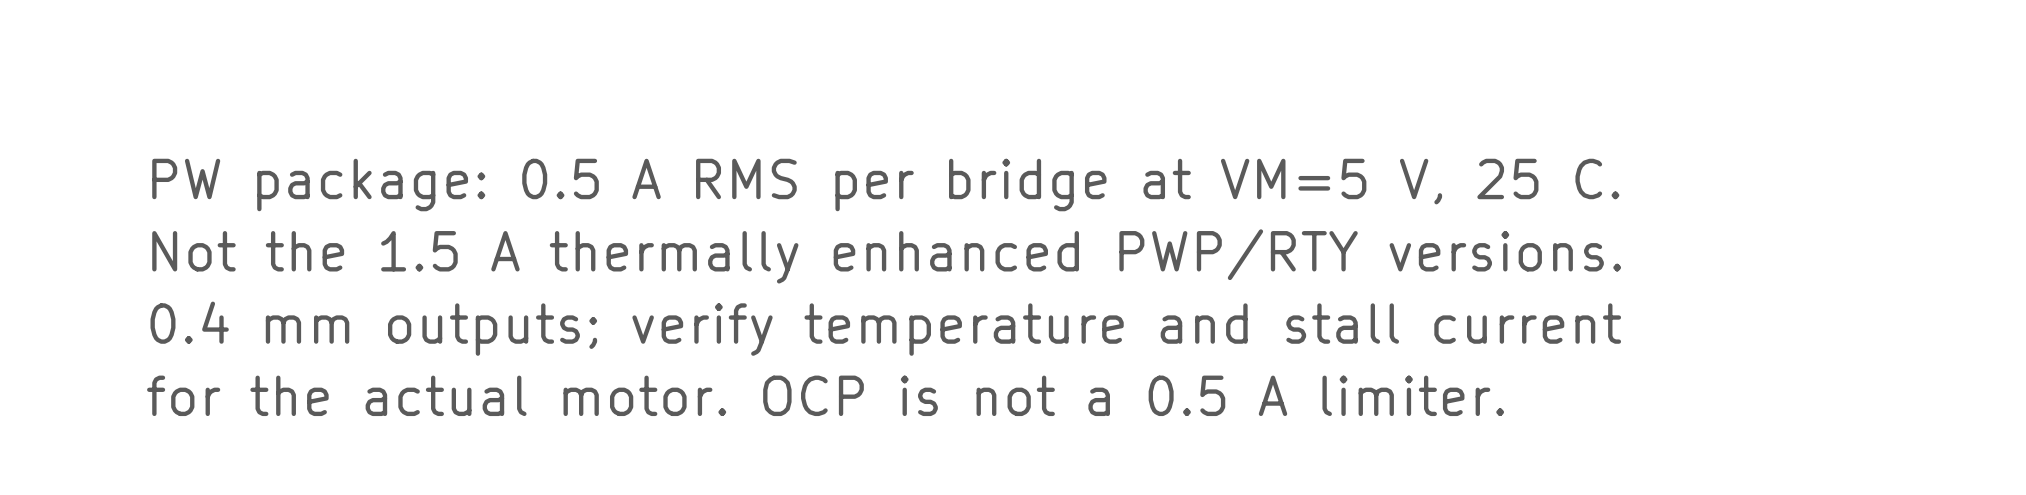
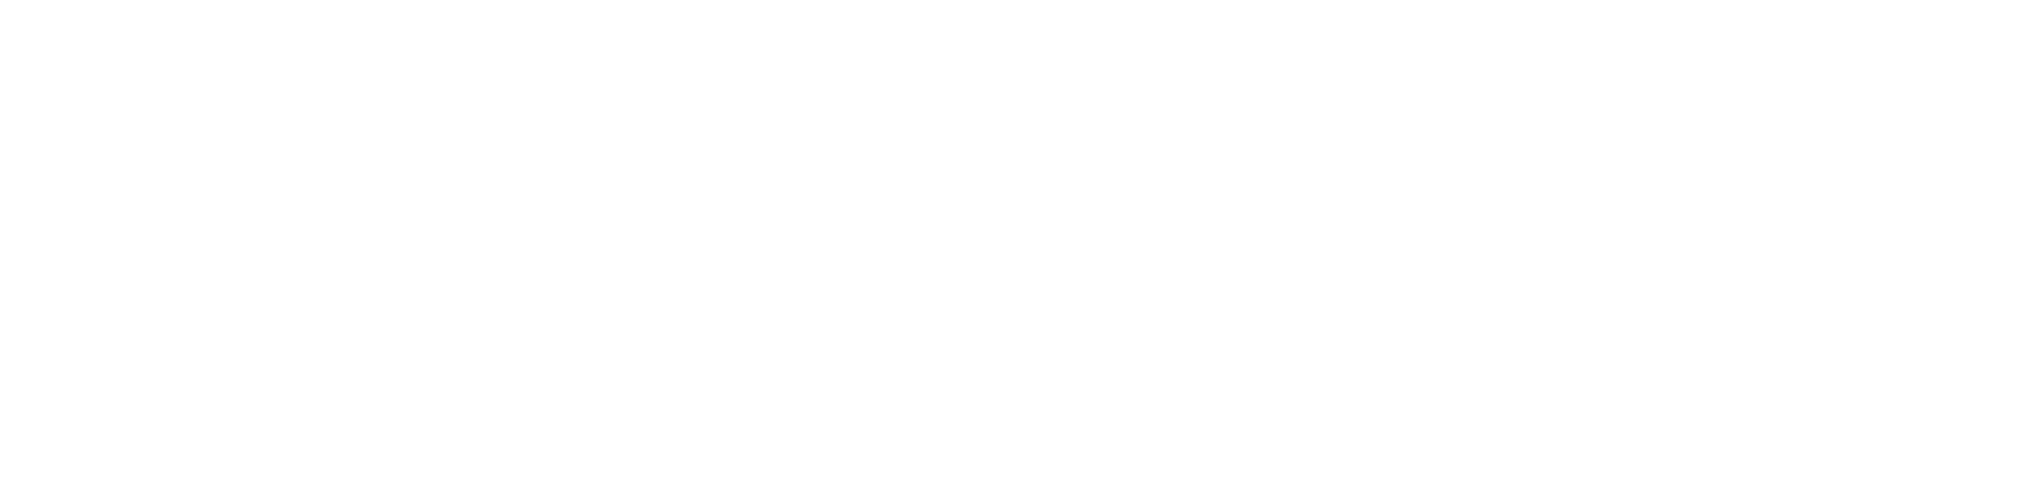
text: PW package: 0.5 A RMS per bridge at VM=5 V, 25 C. (885, 185) -> none
text: Not the 1.5 A thermally enhanced PWP/RTY versions. (886, 256) -> none
text: 0.4 mm outputs; verify temperature and stall current (885, 328) -> none
text: for the actual motor. OCP is not a 0.5 A limiter. (825, 395) -> none

